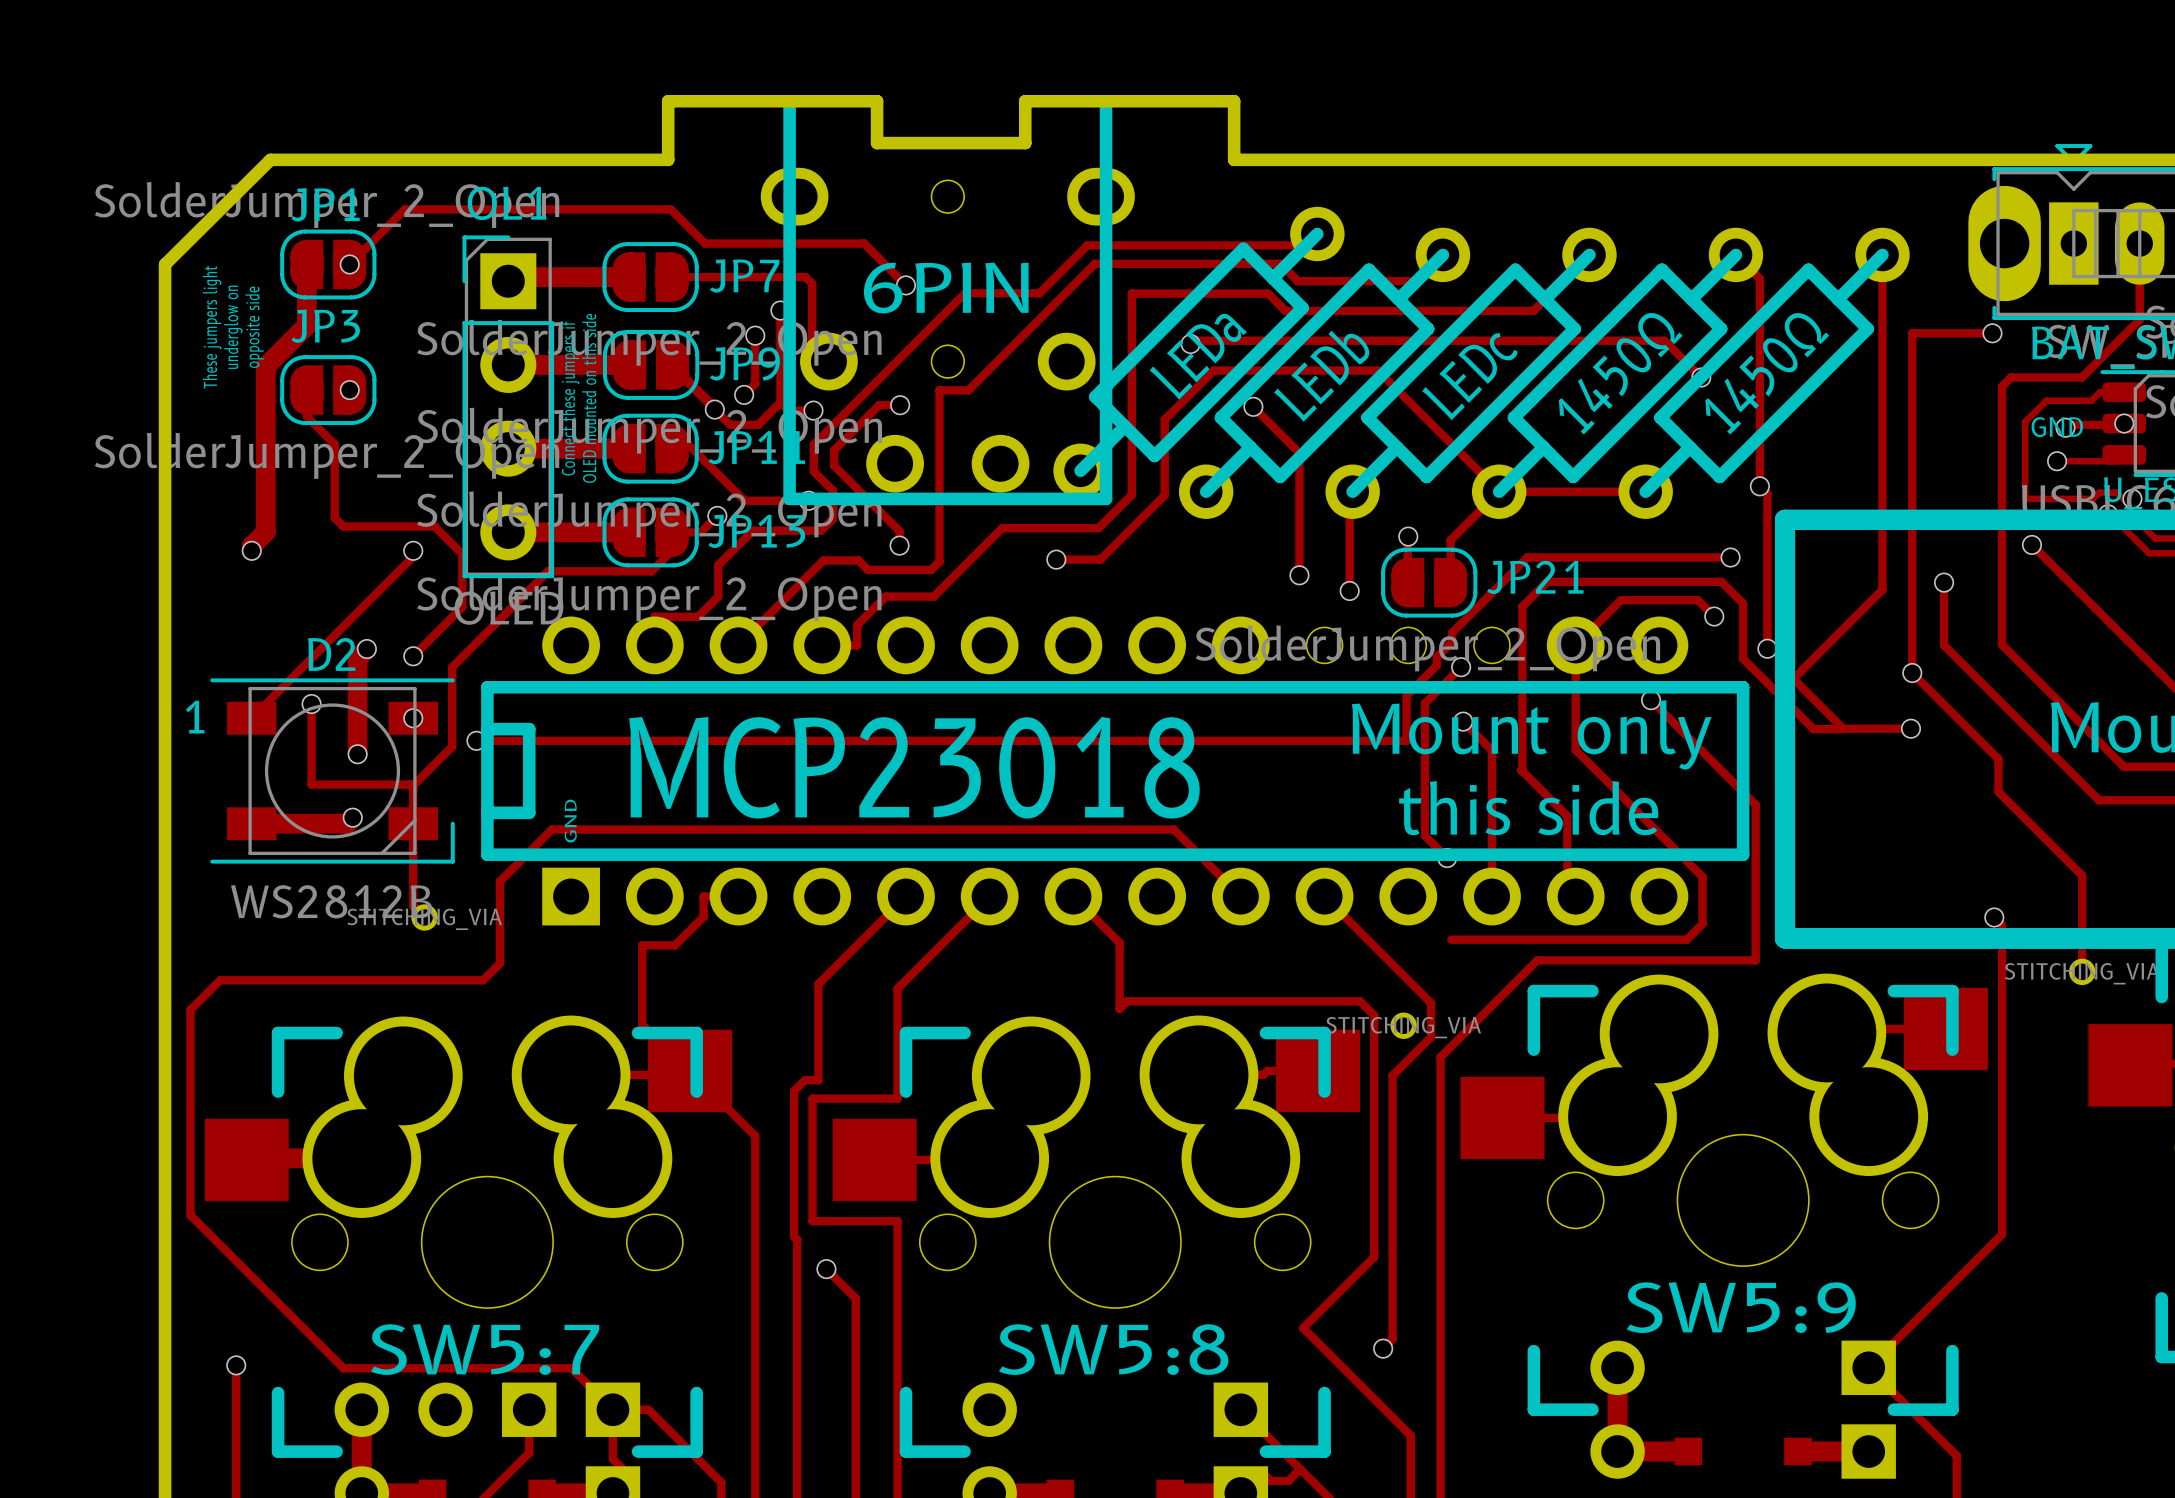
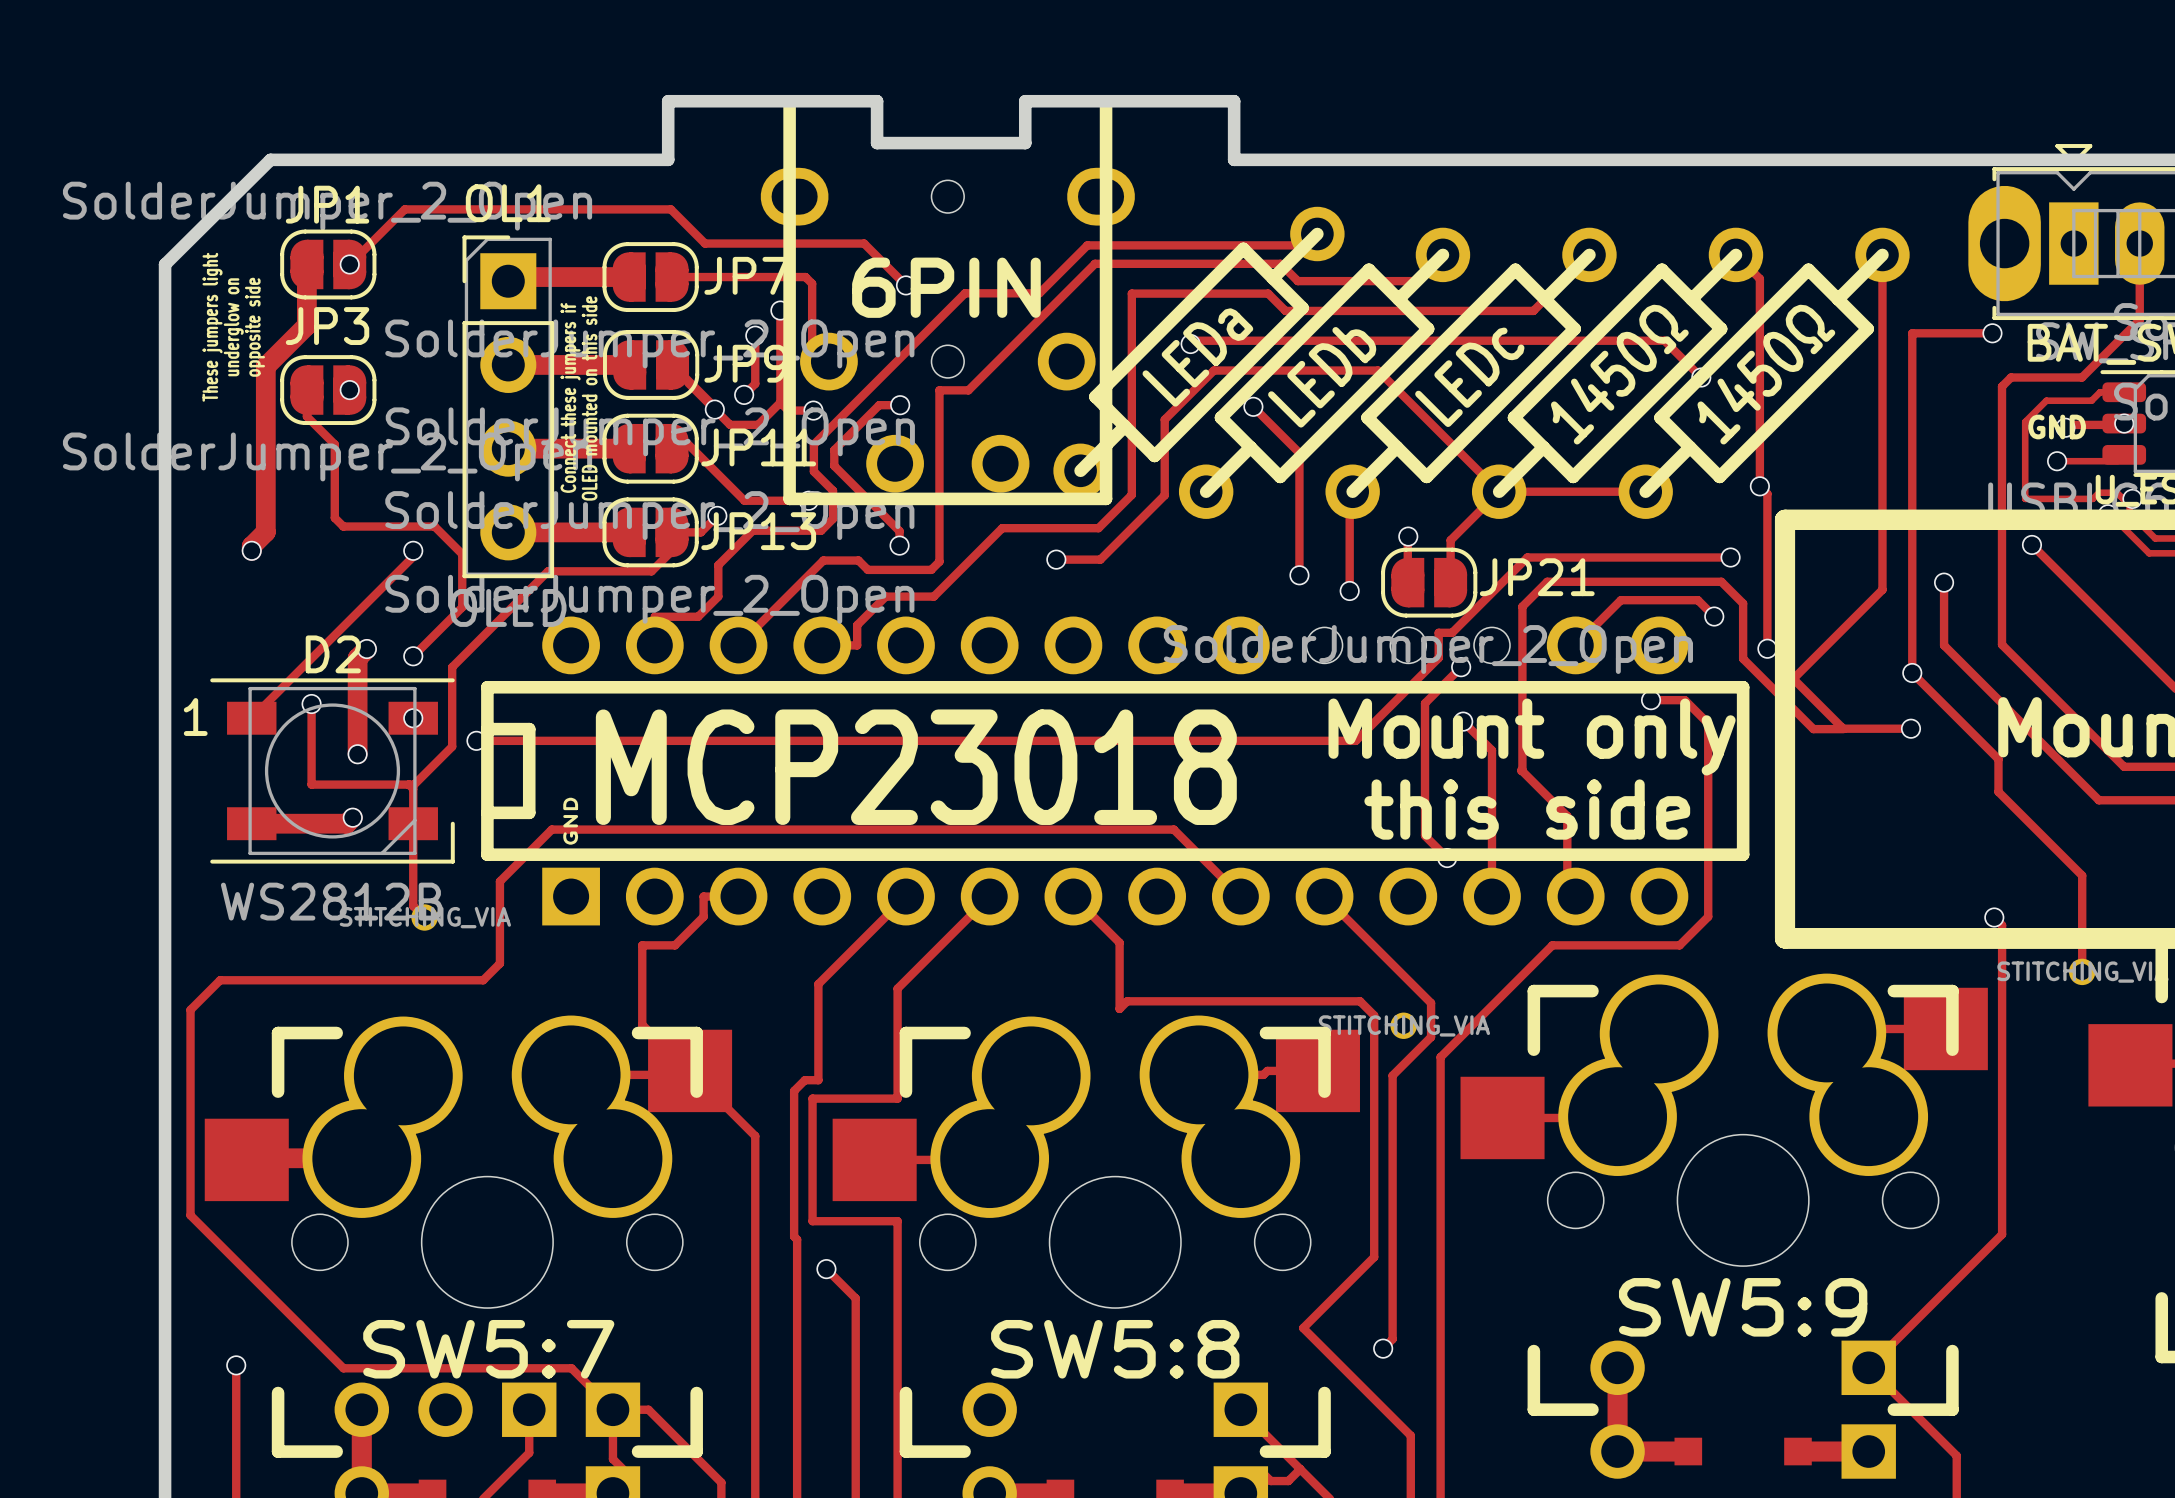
track: (1452, 632) (1452, 641) (1436, 657) (1436, 665) (1406, 695) (1406, 740) (1355, 740) -> (1452, 632) (1438, 632) (1438, 658) (1355, 740)
track: (1575, 645) (1575, 750) (1702, 876) (1702, 923) (1686, 939) (1451, 939) -> none
track: (1651, 700) (1755, 804) (1755, 960) (1537, 960) -> (1651, 700) (1684, 700) (1708, 723) (1708, 916) (1679, 945) (1552, 945) (1537, 960)

